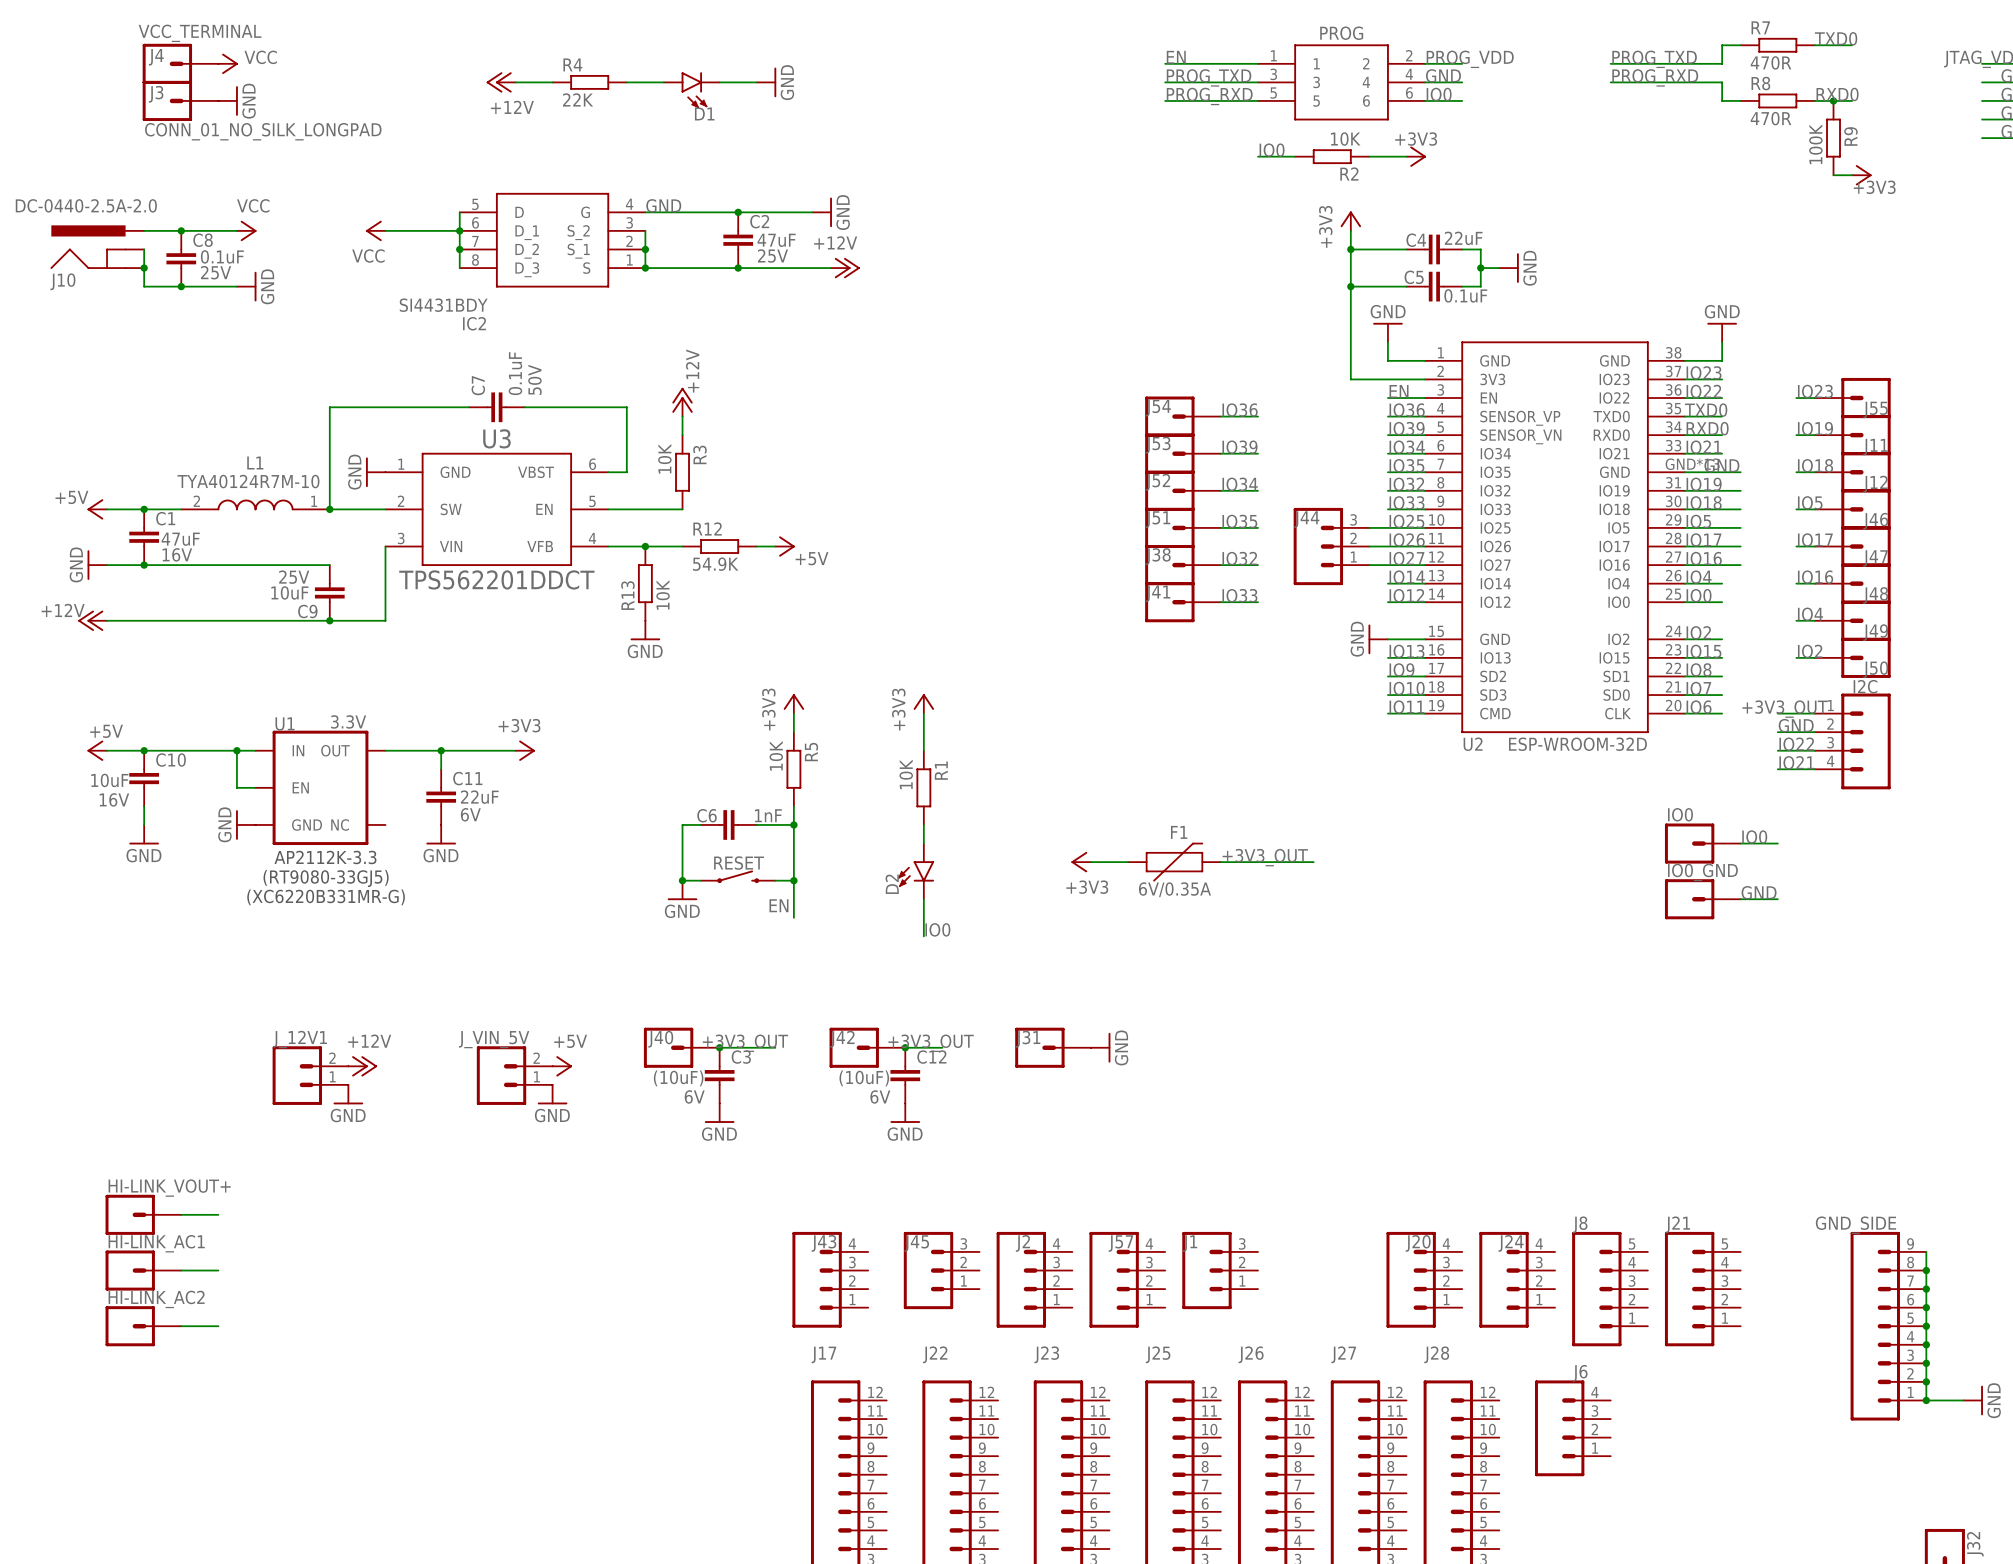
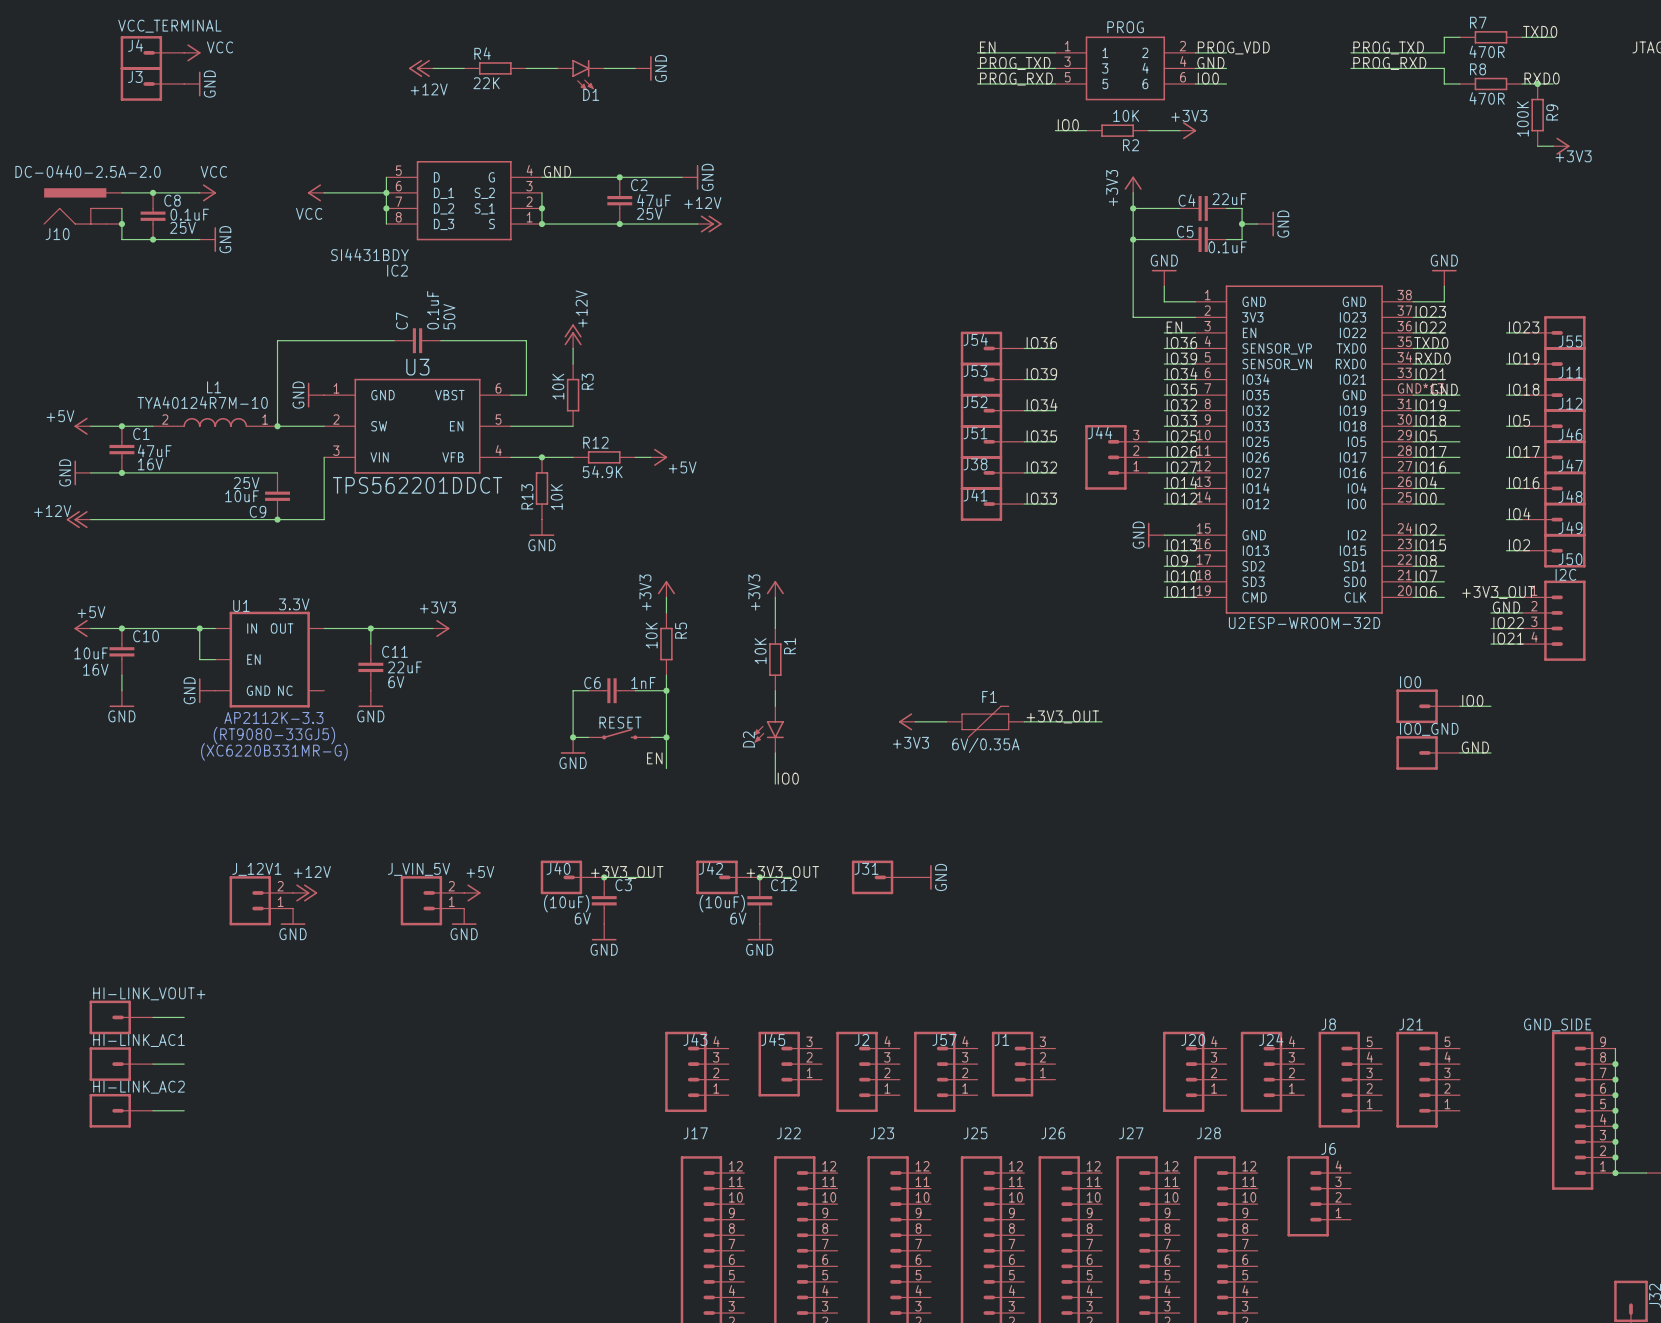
J3 value: CONN_01_NO_SILK_LONGPAD (263, 131) -> none

